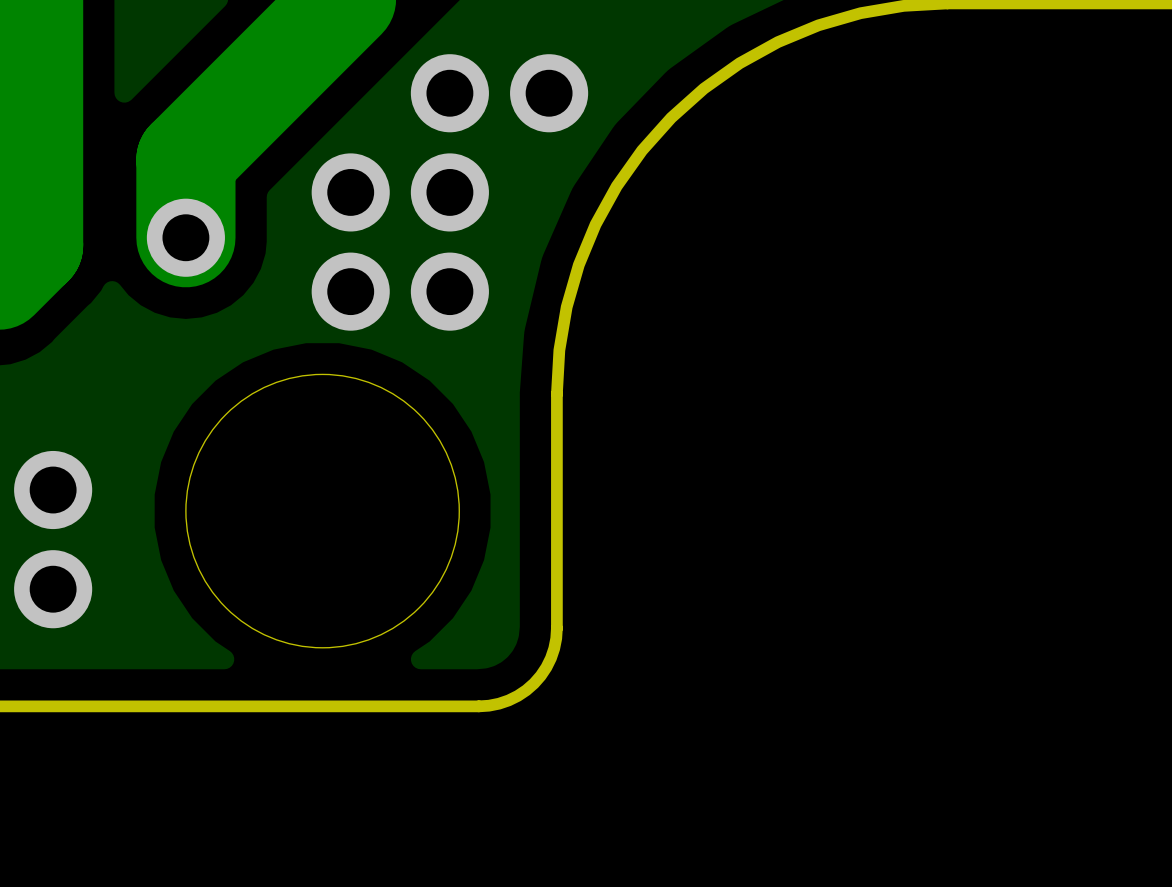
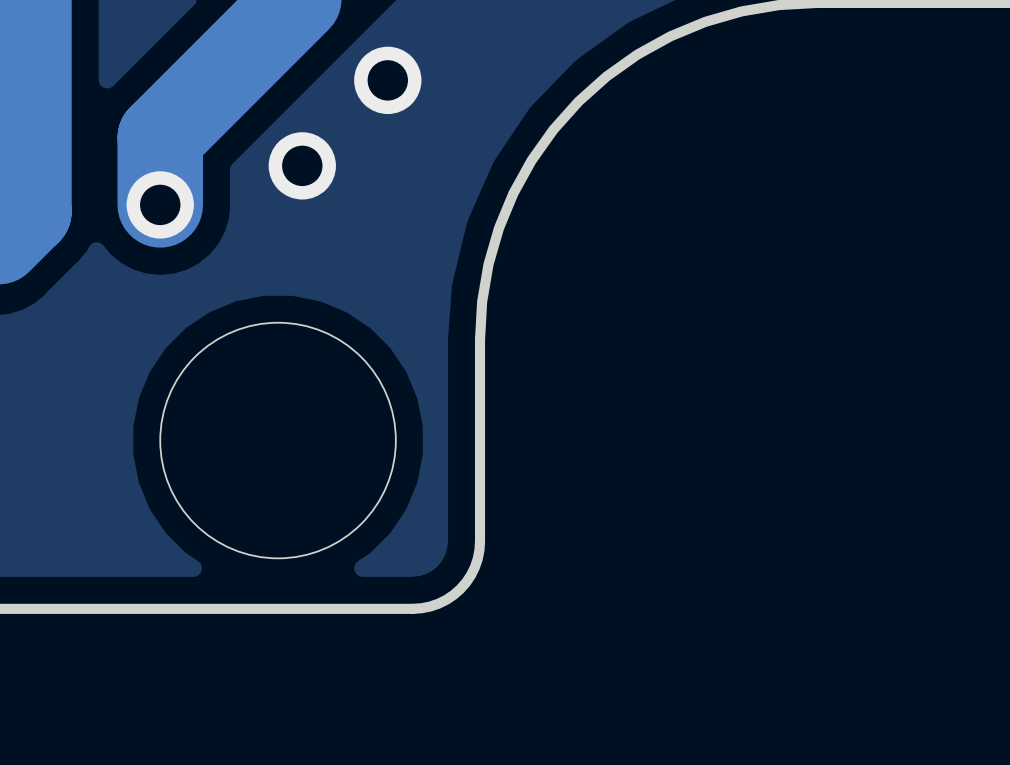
via: (549, 93) -> none
via: (449, 192) -> none
via: (350, 291) -> none
via: (449, 291) -> none
via: (53, 490) -> none
via: (53, 589) -> none

